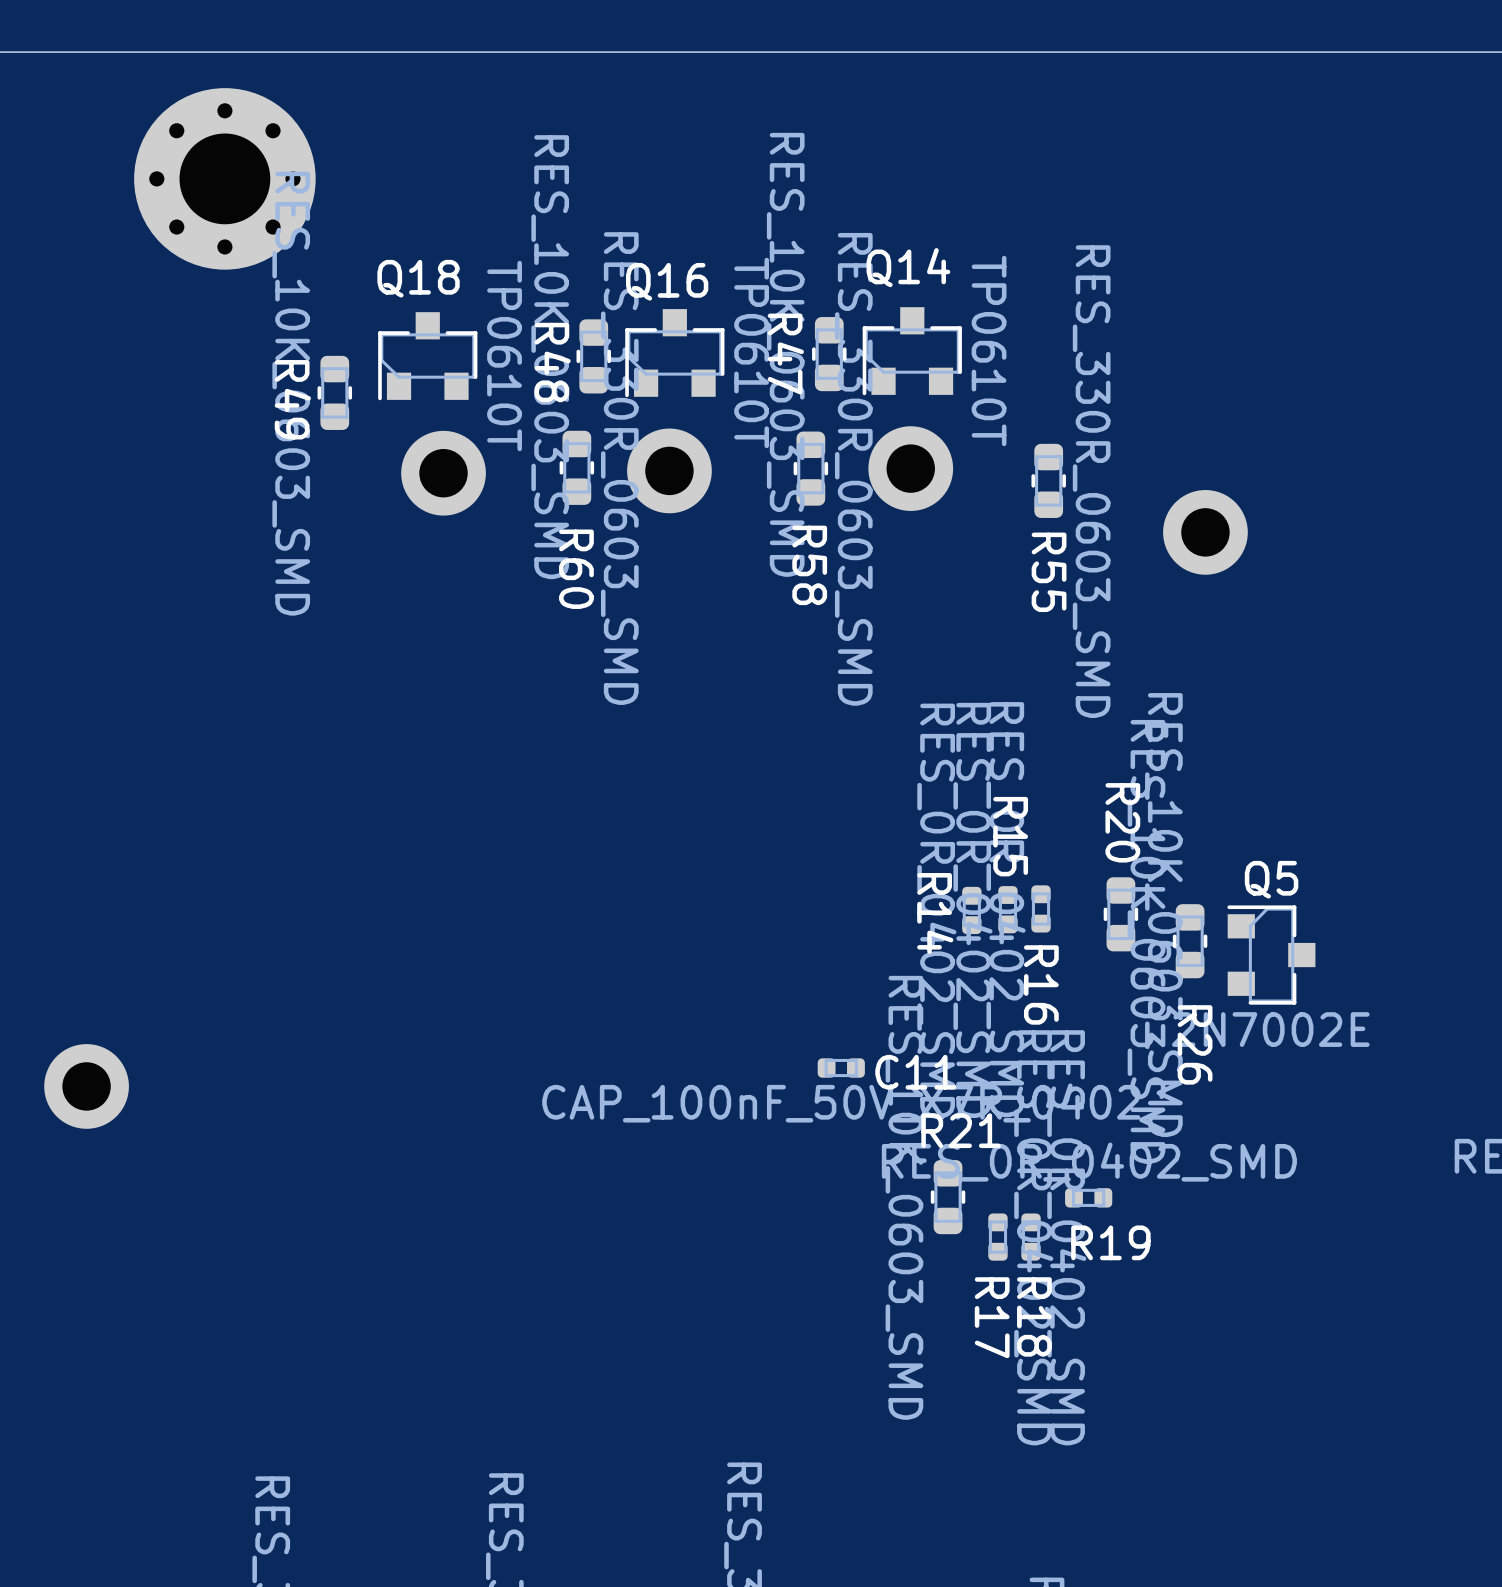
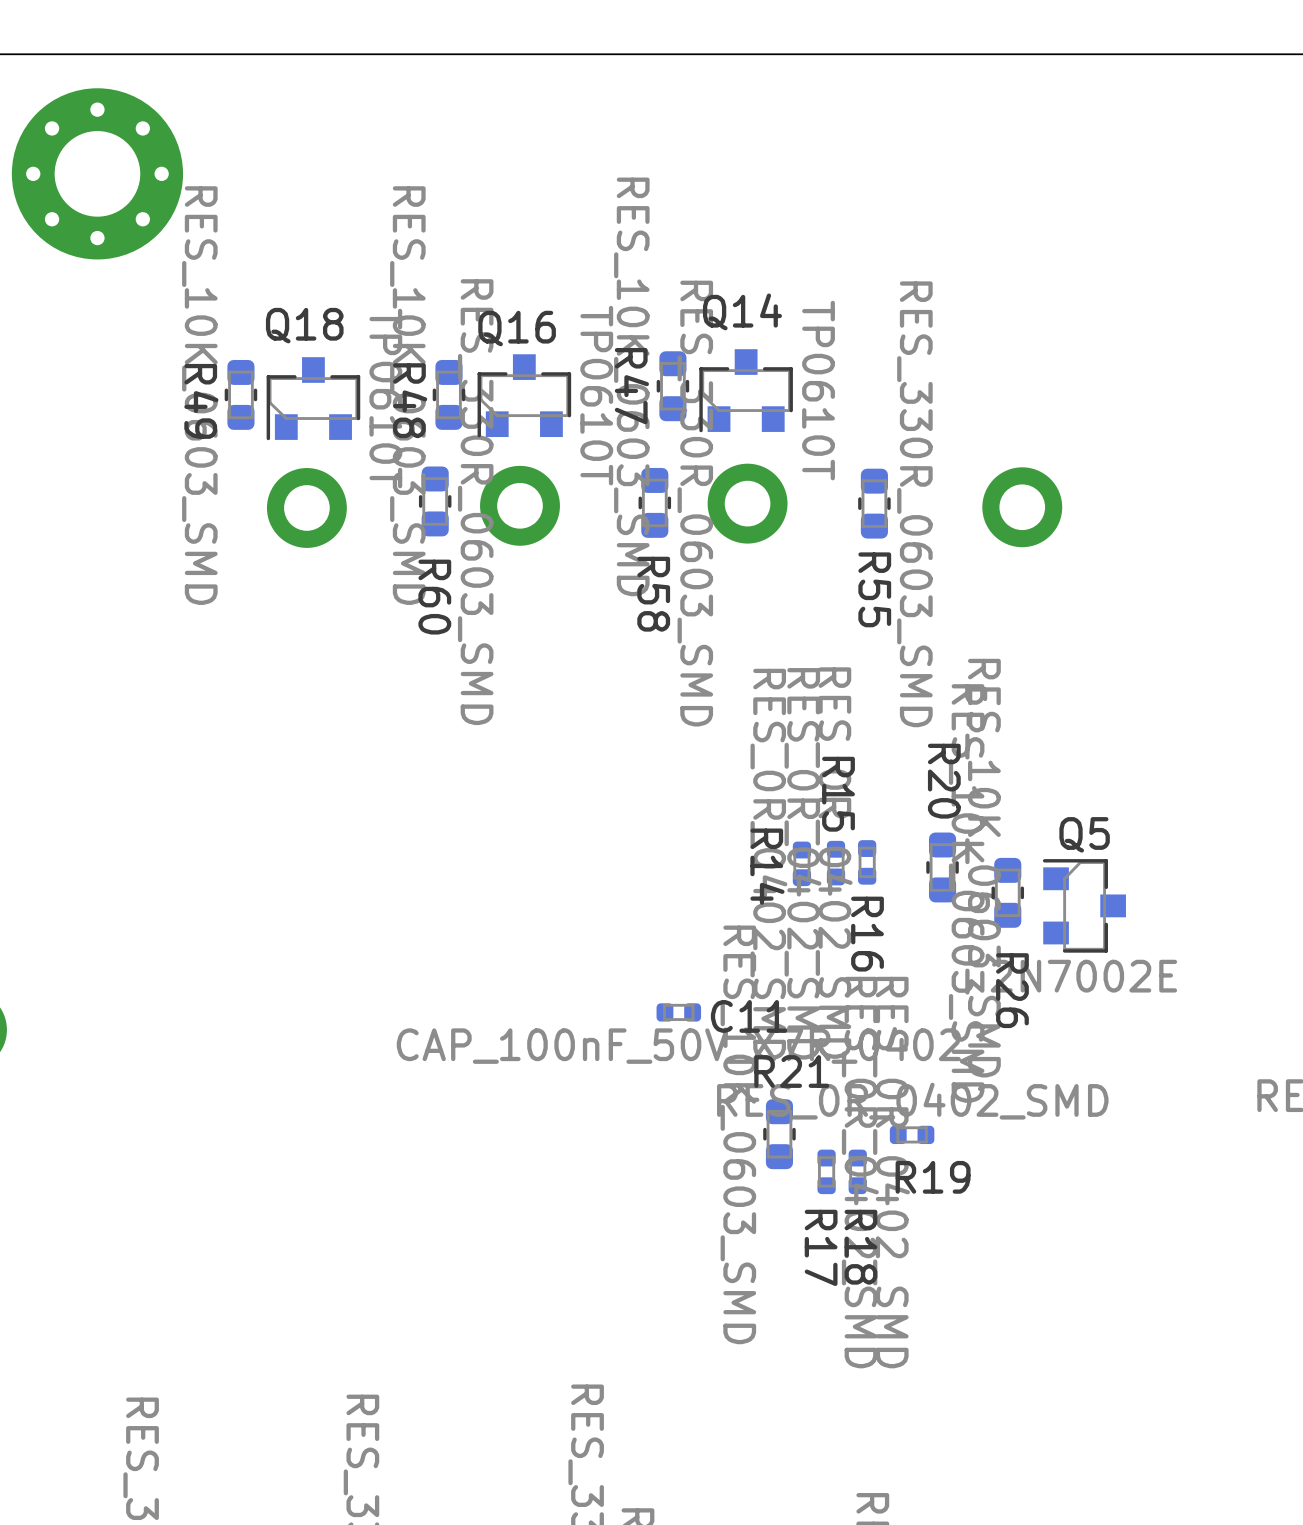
Q14 position: (912, 351) -> (746, 390)
Q16 position: (674, 353) -> (524, 395)
R47 position: (829, 354) -> (672, 386)
Q18 position: (427, 356) -> (313, 398)
R48 position: (593, 356) -> (448, 394)
R49 position: (334, 392) -> (240, 394)
R60 position: (576, 467) -> (435, 501)
R58 position: (810, 468) -> (654, 502)
part position: (910, 468) -> (747, 503)
part position: (669, 470) -> (519, 505)
part position: (443, 473) -> (306, 507)
R55 position: (1048, 480) -> (874, 503)

